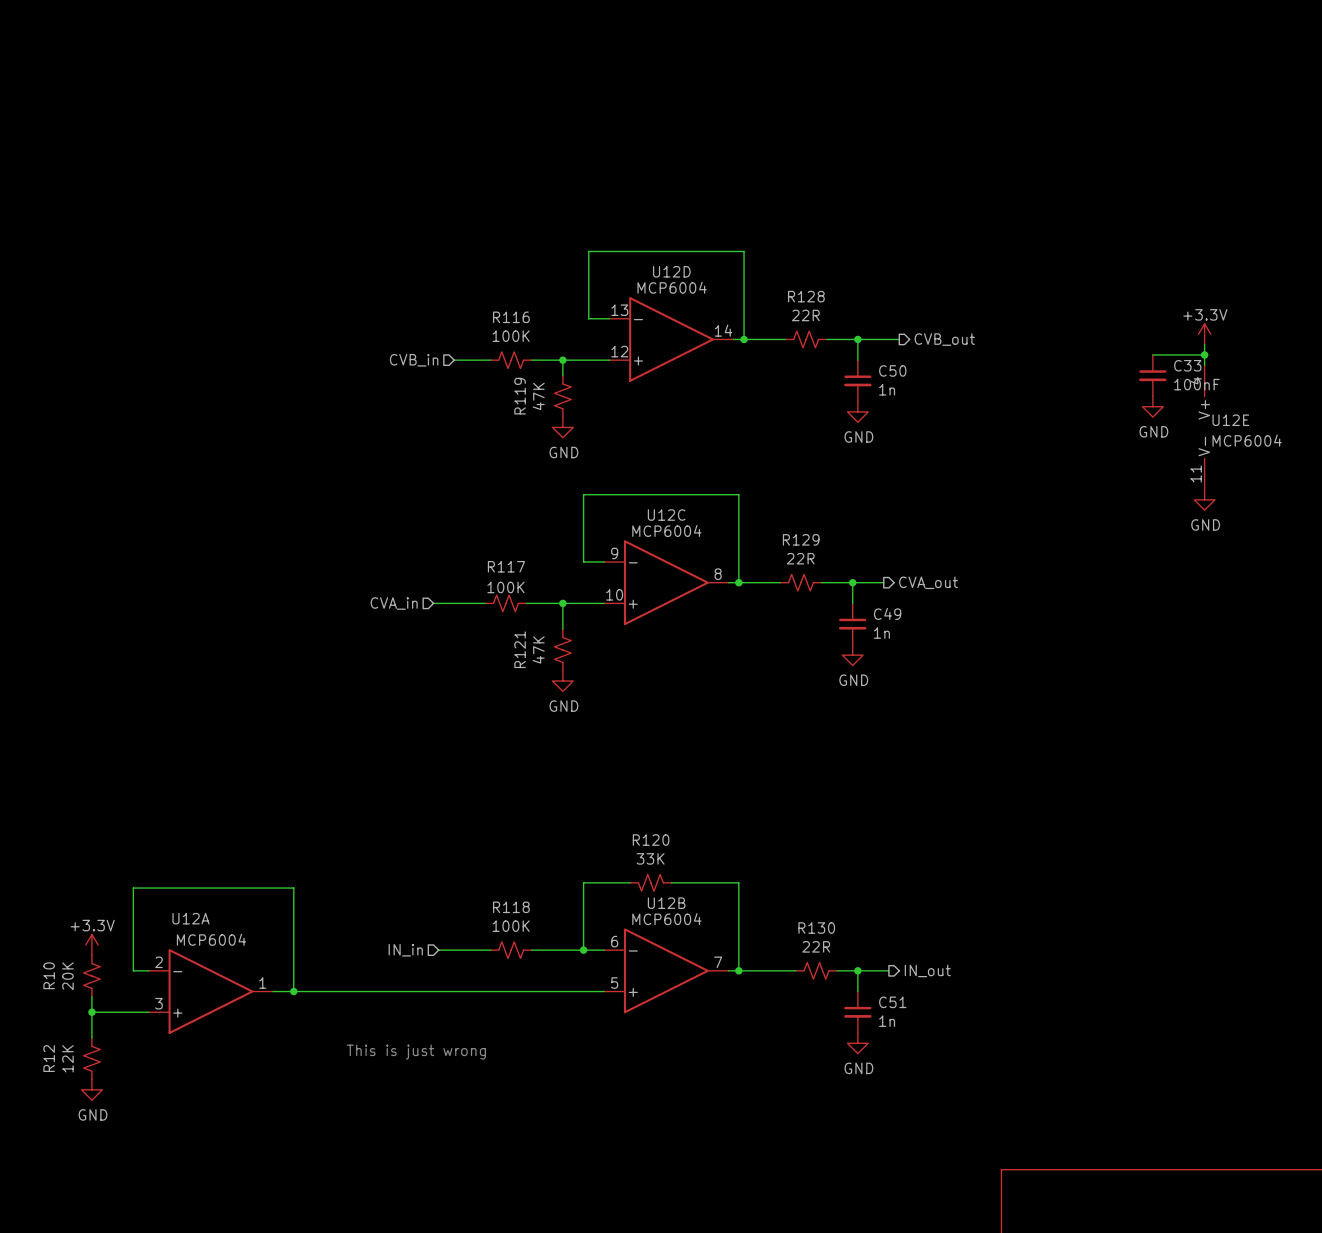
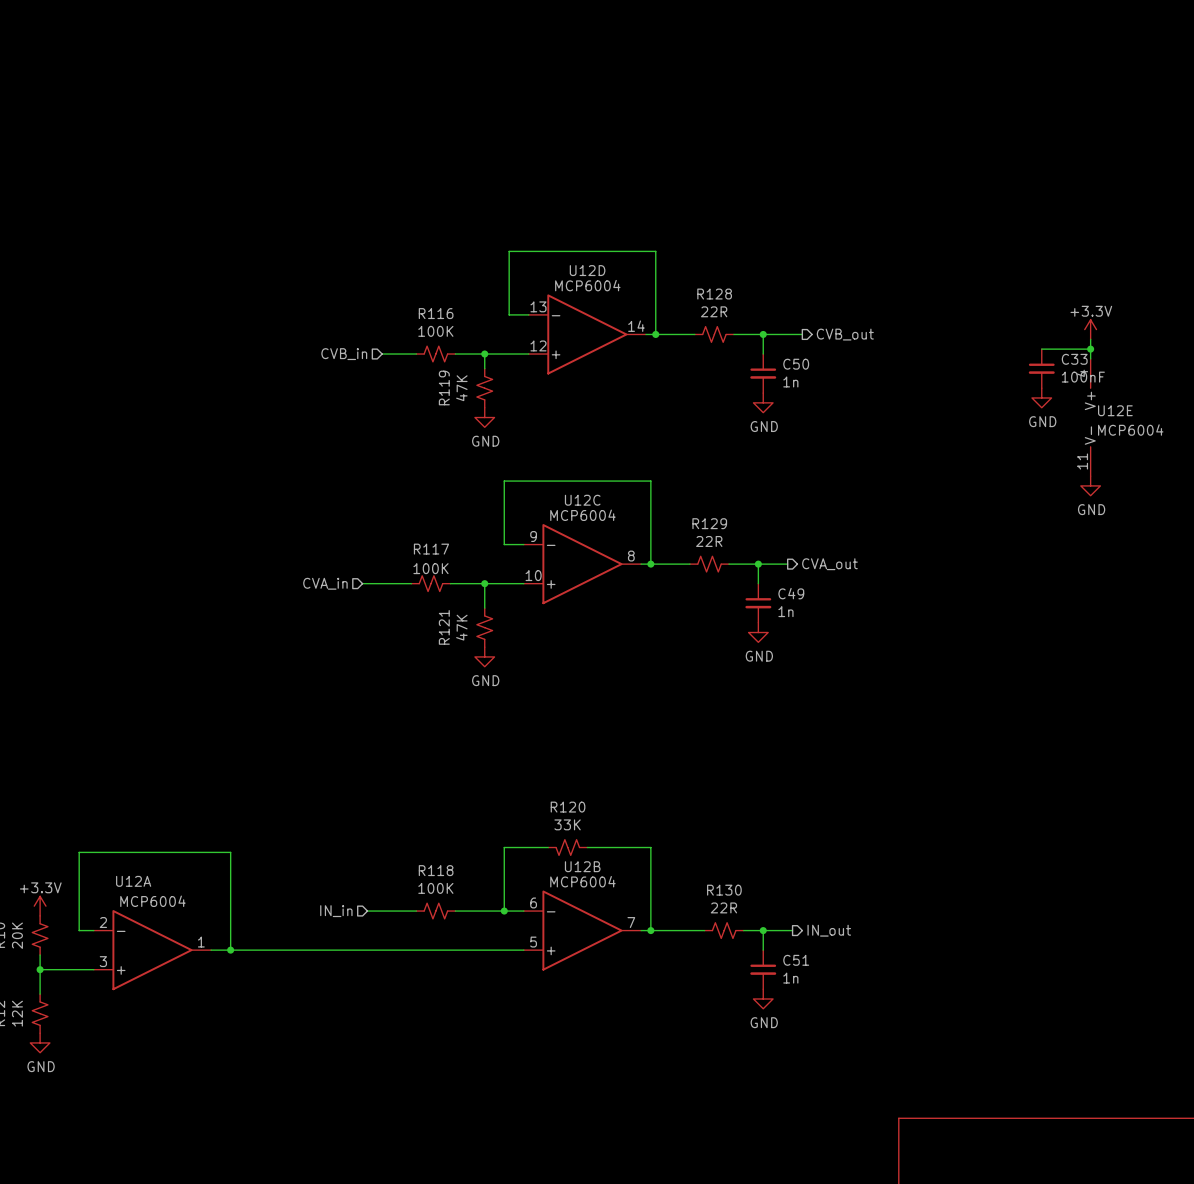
text: This is just wrong (416, 1052) -> none

